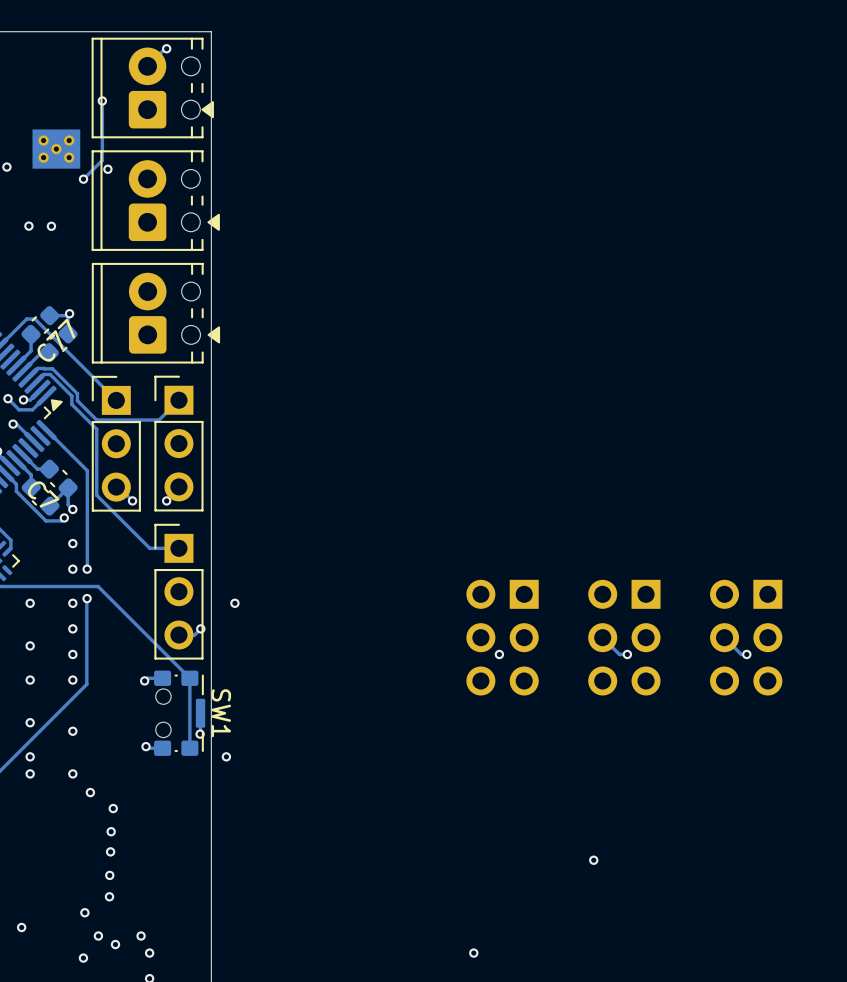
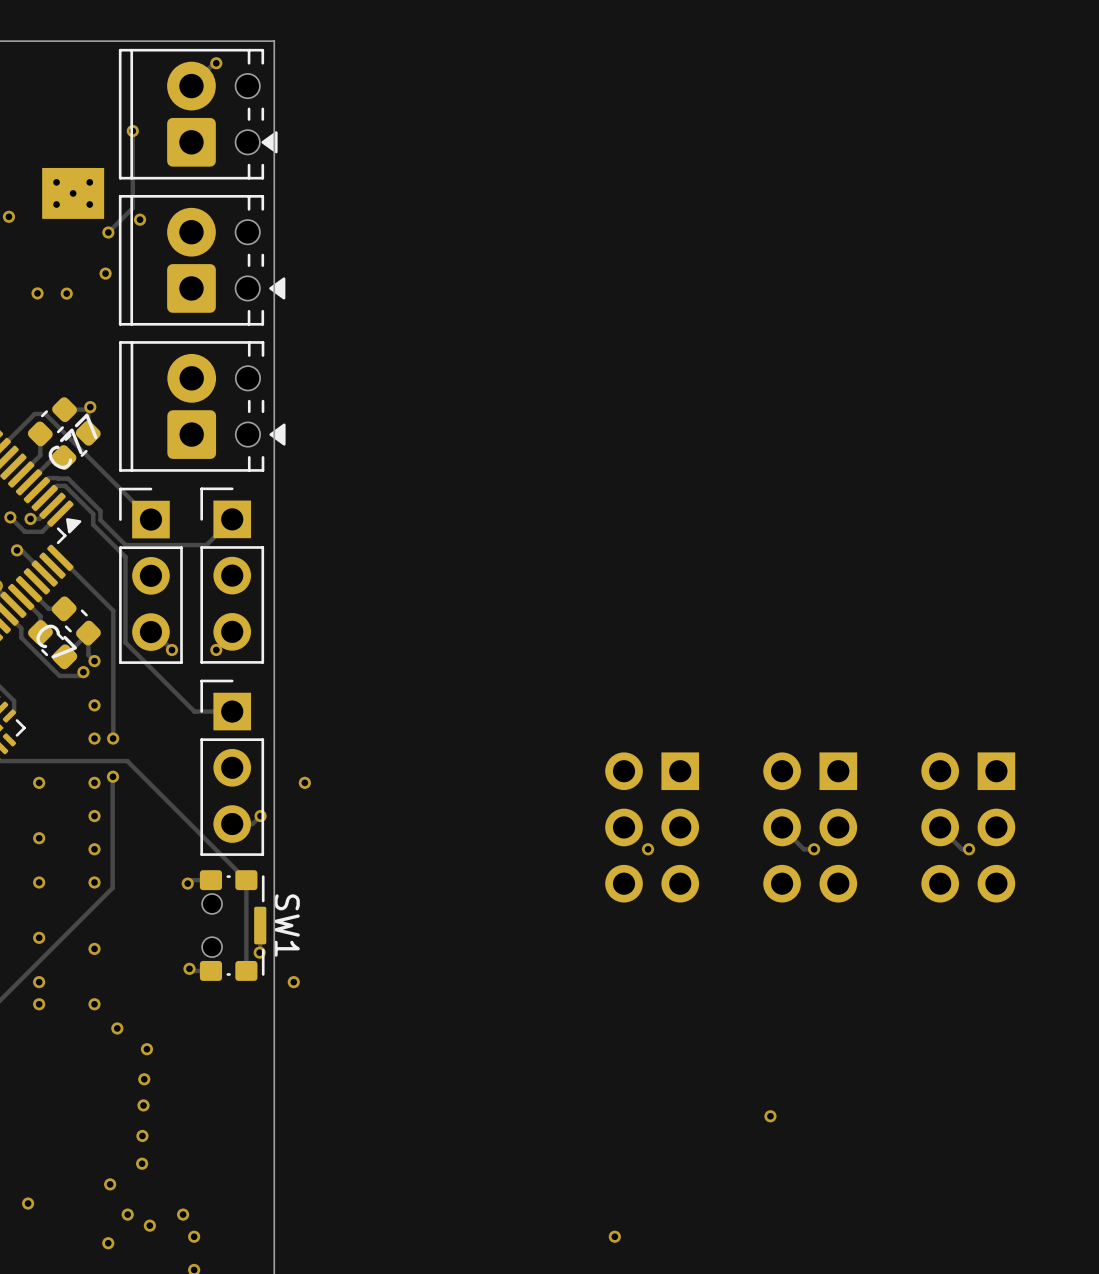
via: none -> (105, 273)

